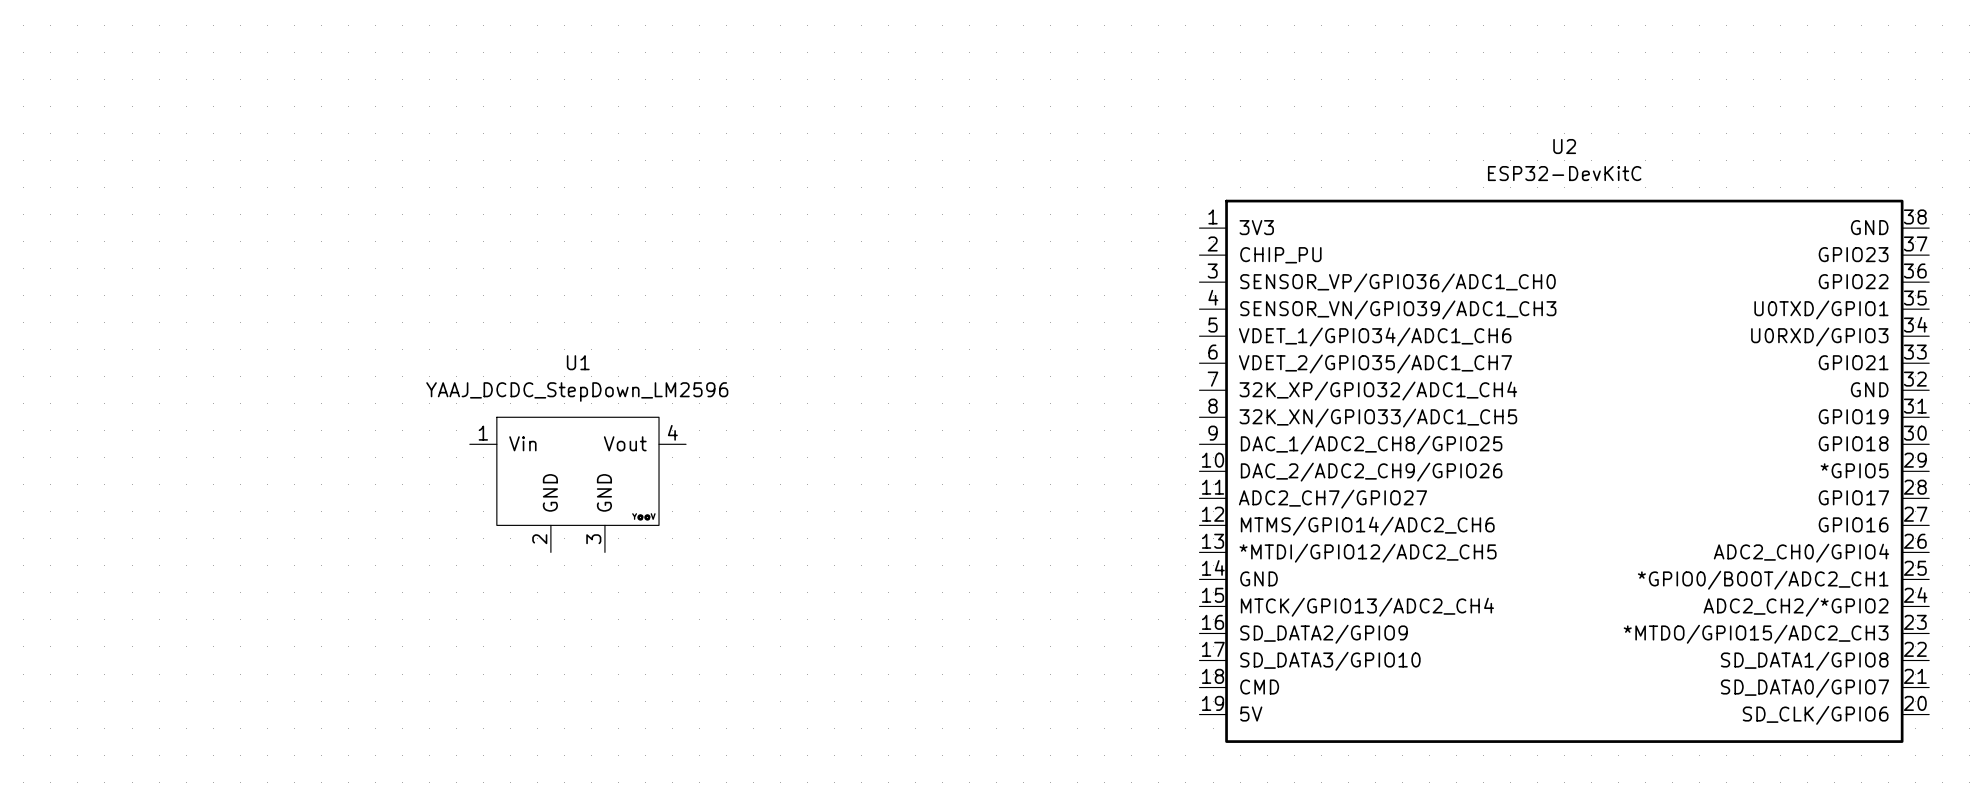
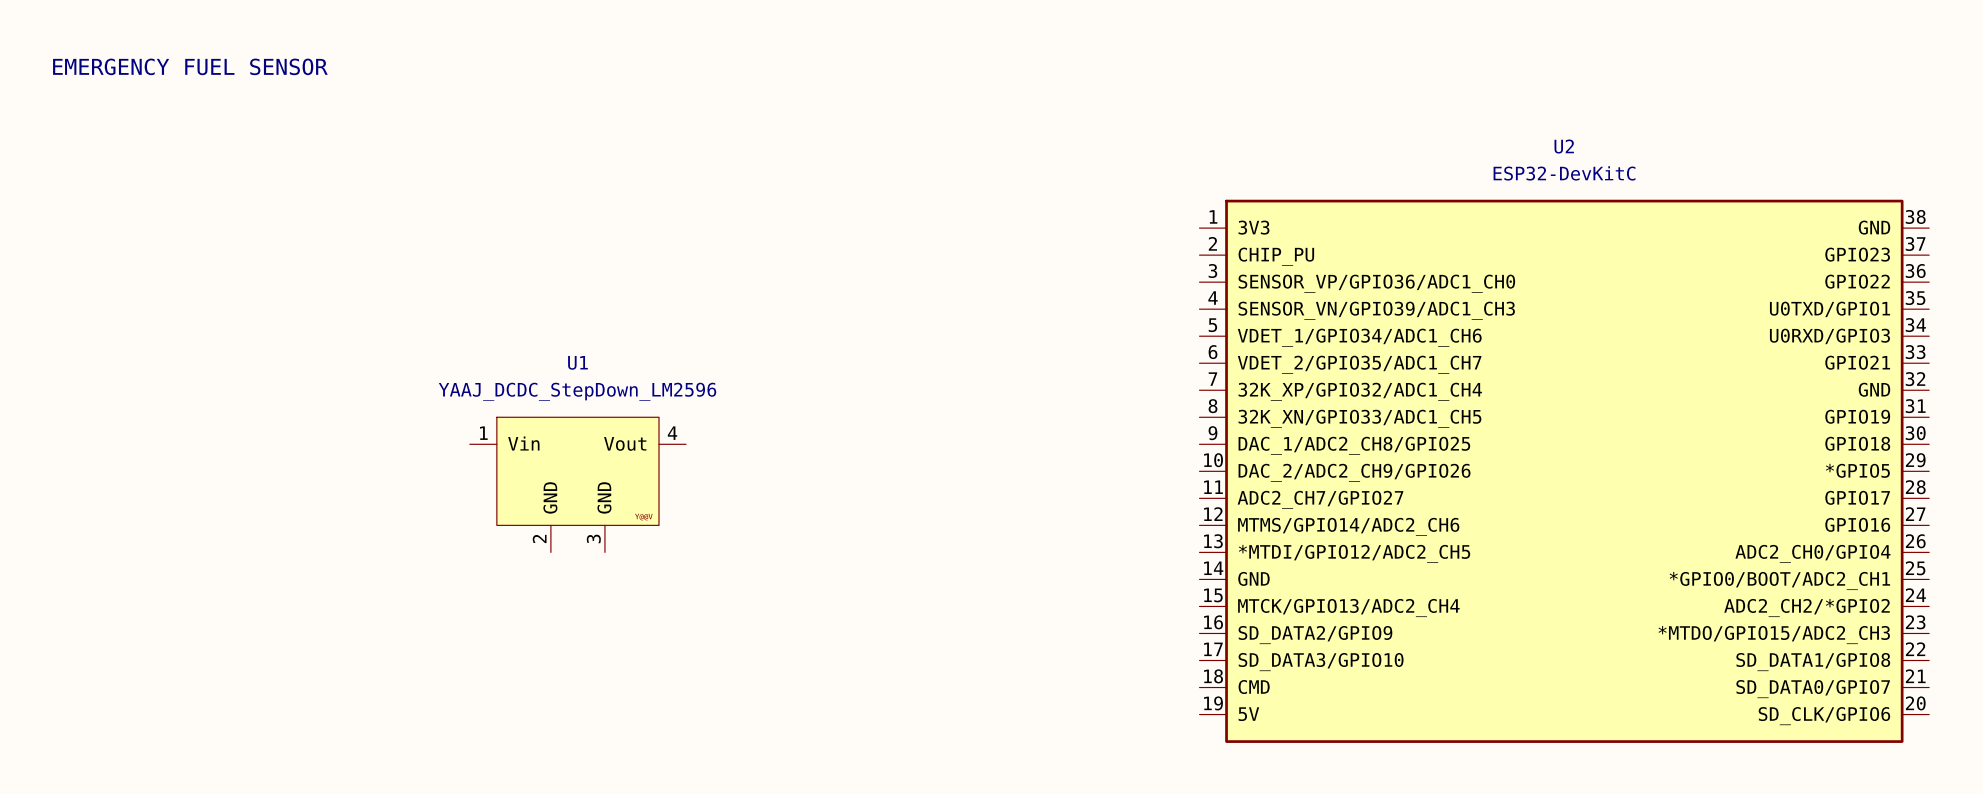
text: none -> EMERGENCY FUEL SENSOR (190, 66)

